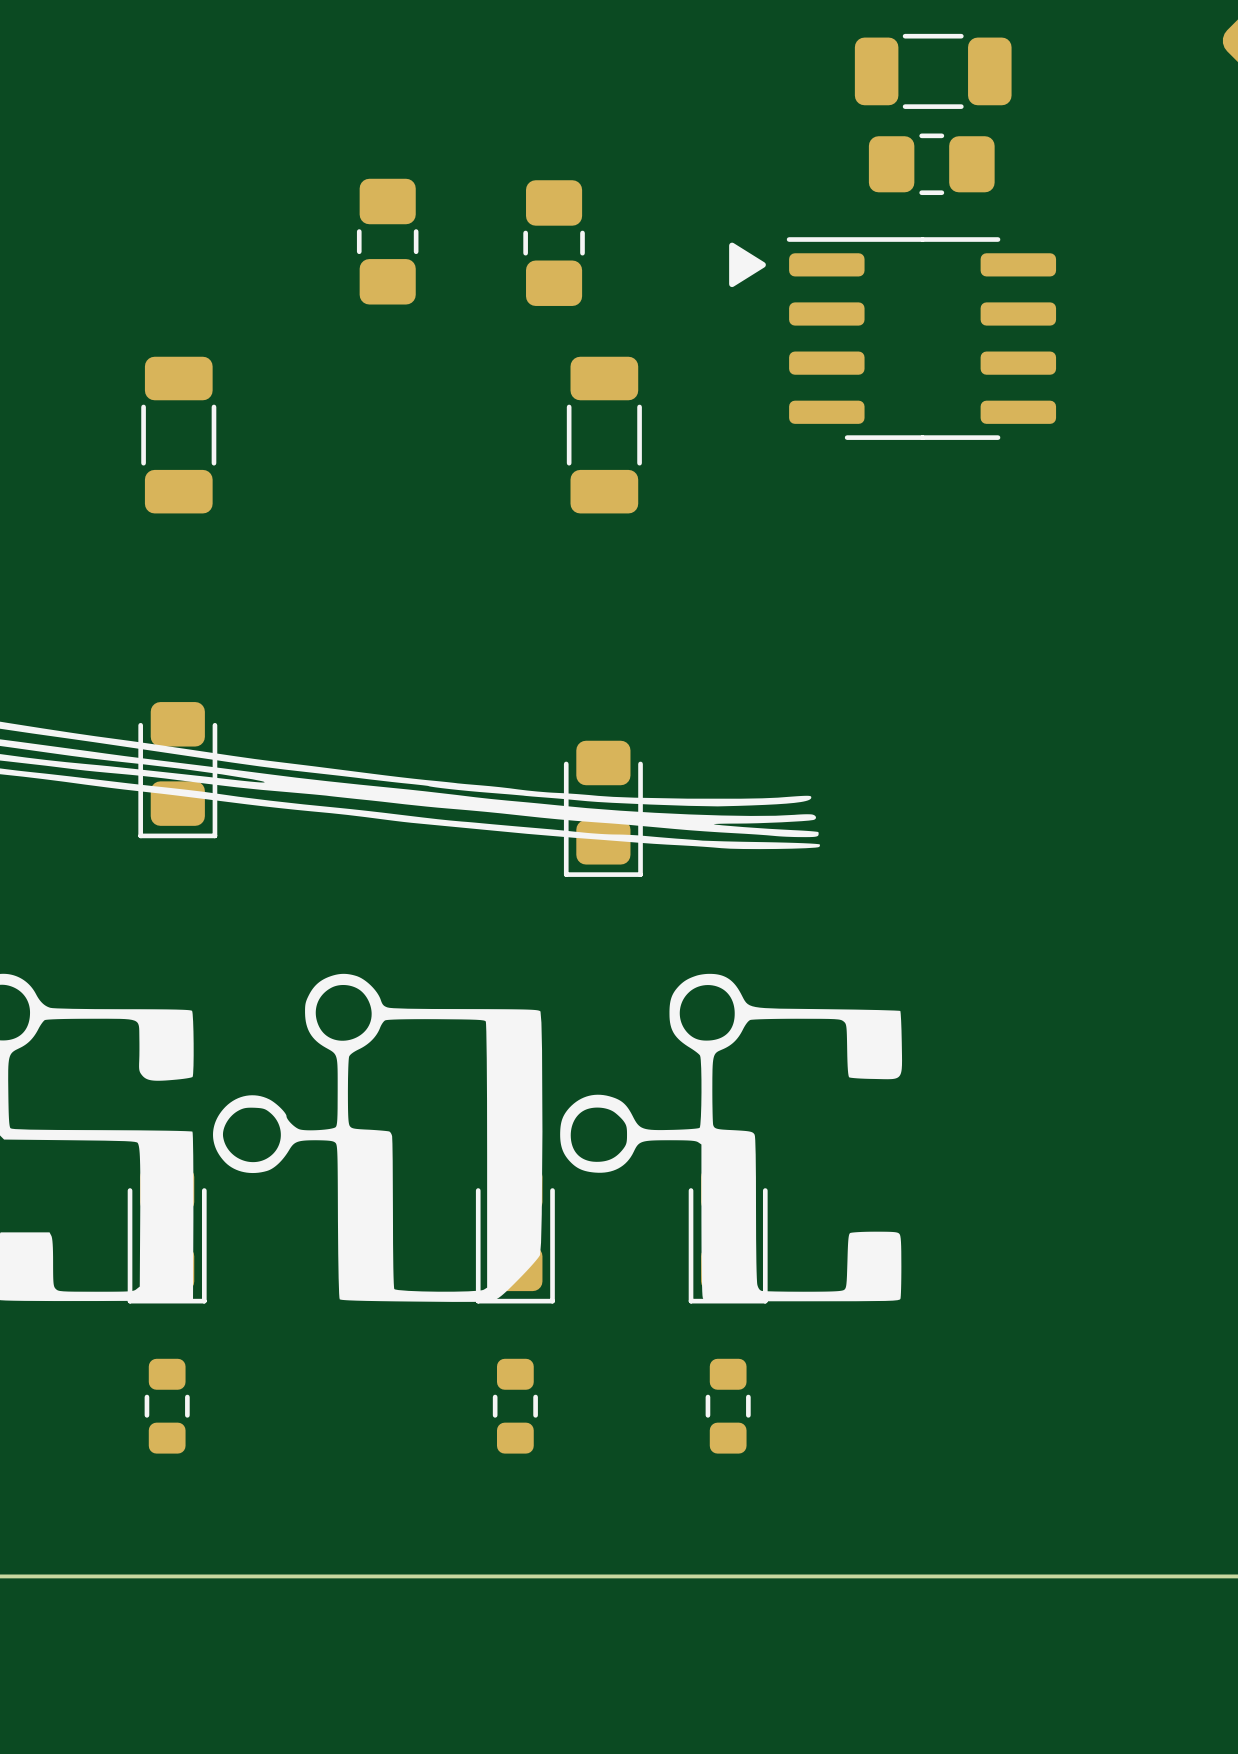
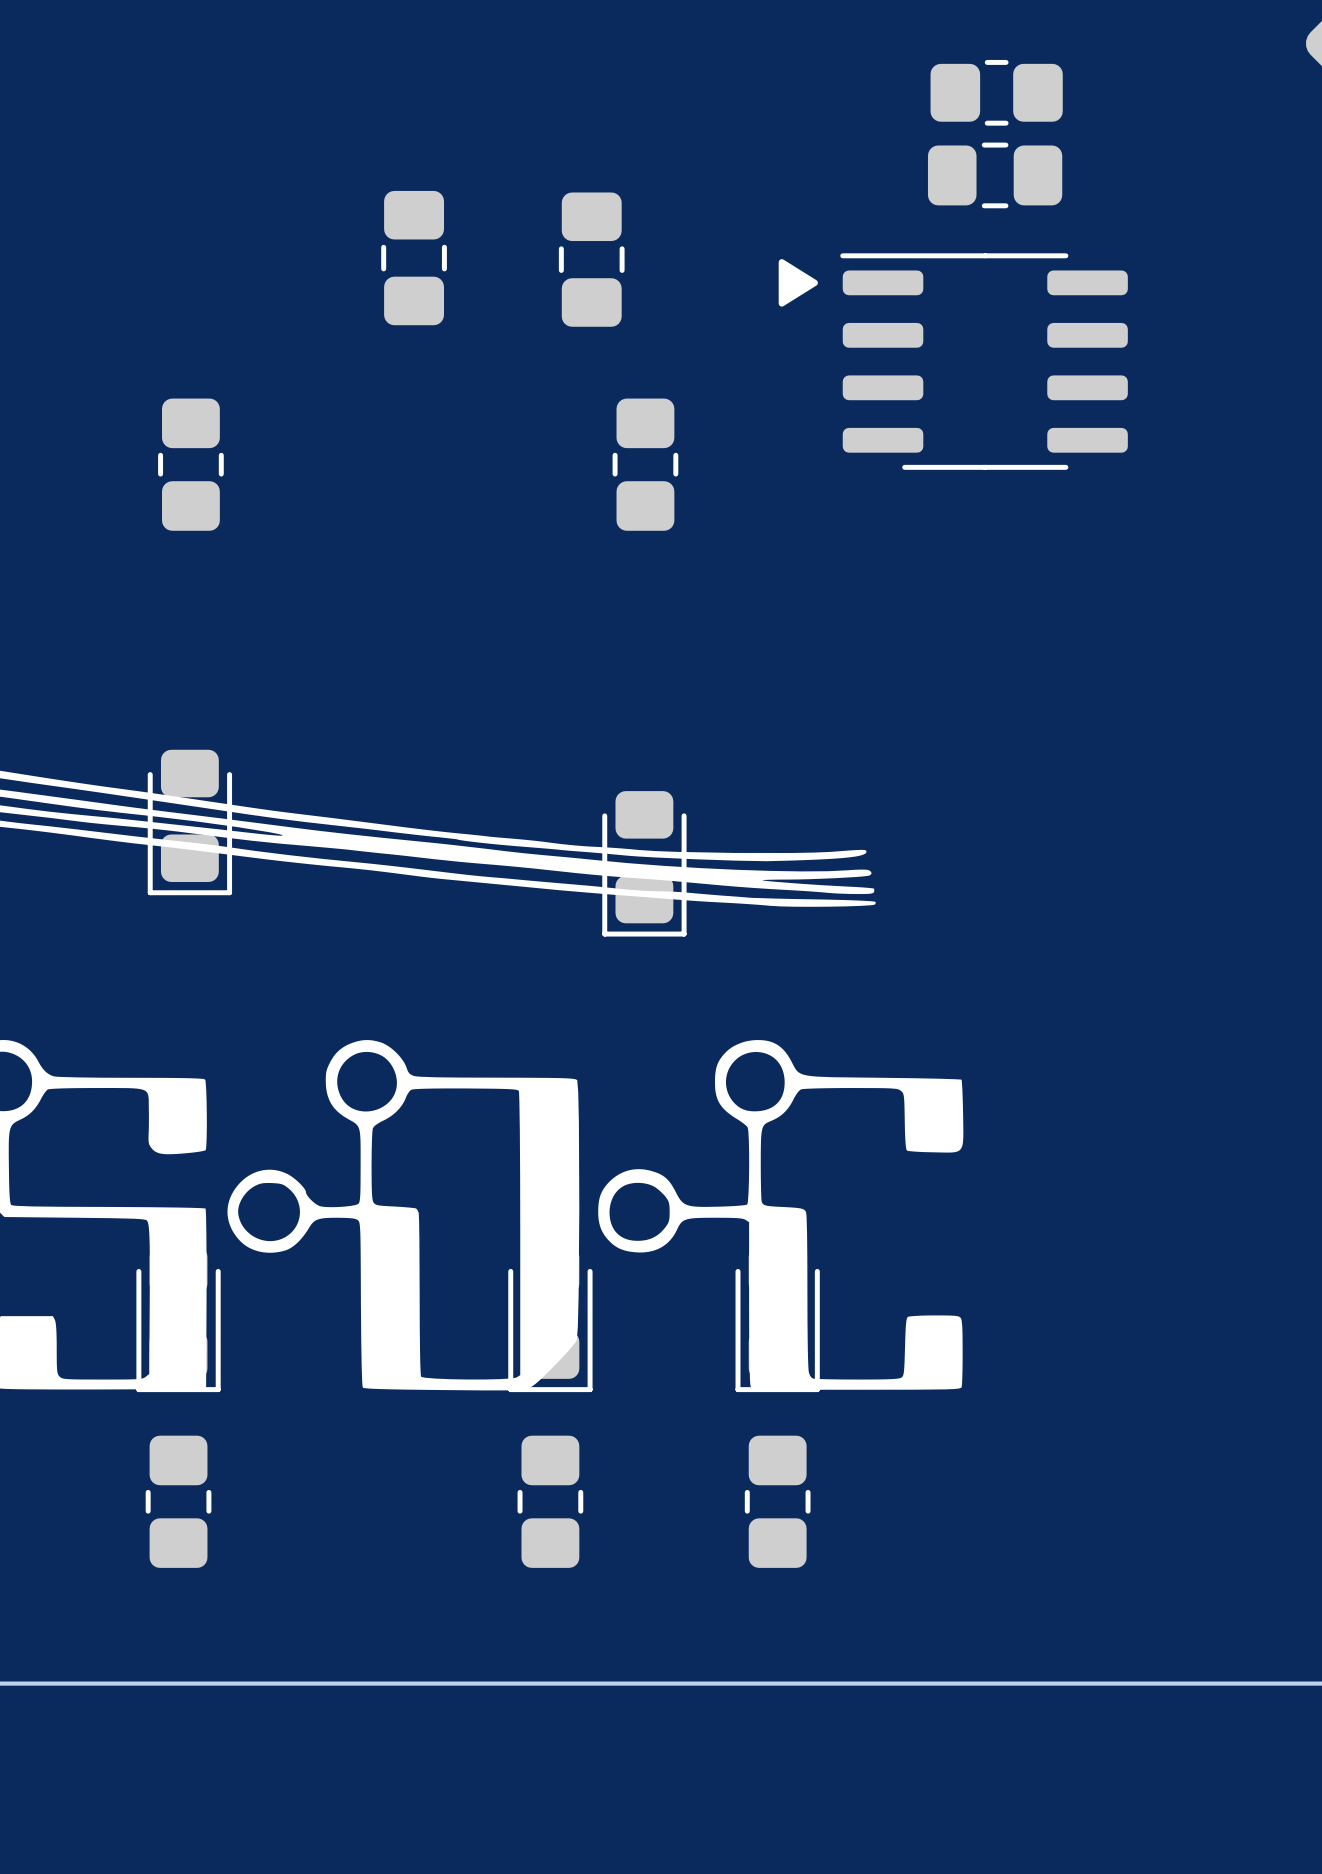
part footprint: [854, 33, 1012, 109] -> [930, 59, 1063, 126]
part footprint: [141, 356, 217, 514] -> [158, 398, 224, 531]
part footprint: [566, 356, 642, 514] -> [612, 398, 679, 531]
part footprint: [144, 1358, 190, 1454] -> [145, 1435, 212, 1568]
part footprint: [492, 1358, 538, 1454] -> [517, 1435, 584, 1568]
part footprint: [705, 1358, 751, 1454] -> [744, 1435, 811, 1568]

